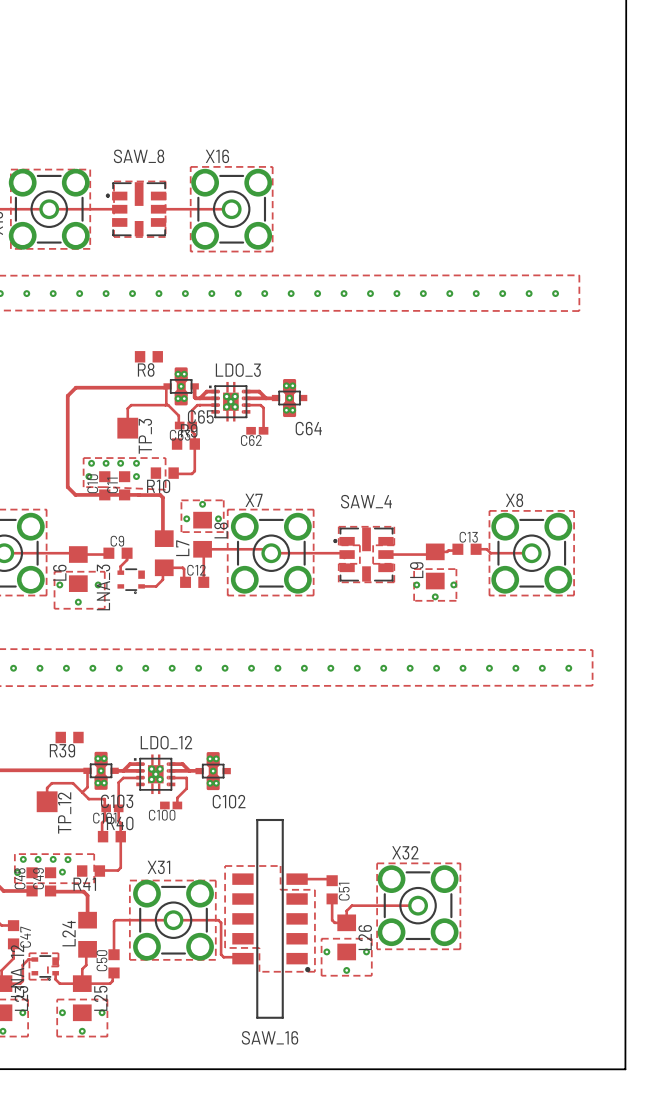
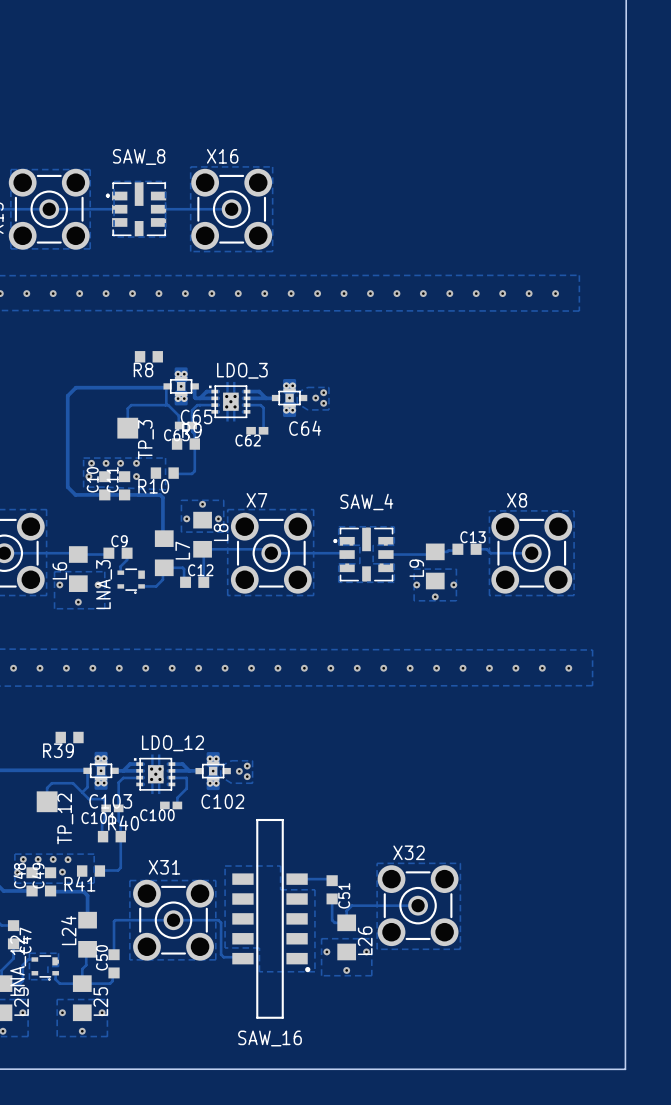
zone outline: none -> (307, 387) (297, 392) (297, 403) (307, 409) (328, 409) (328, 387) (307, 387)
via: none -> (323, 392)
via: none -> (315, 398)
via: none -> (323, 403)
zone outline: none -> (231, 760) (220, 766) (220, 776) (231, 783) (252, 783) (252, 760) (231, 760)
via: none -> (247, 766)
via: none -> (239, 771)
via: none -> (247, 776)

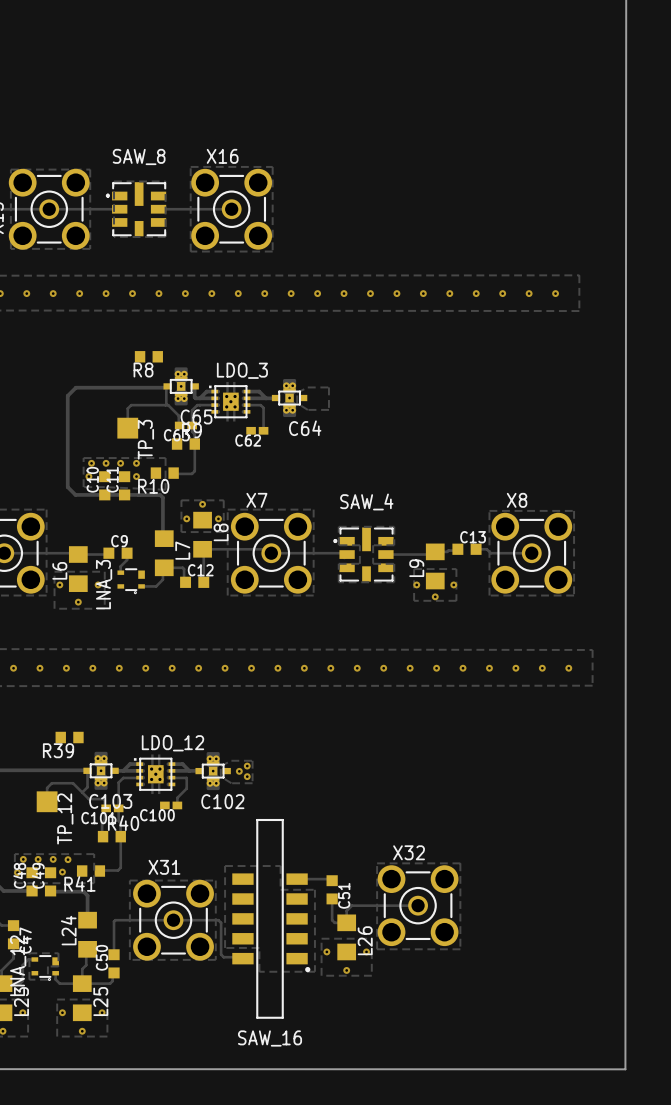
via: (323, 392) -> none
via: (315, 398) -> none
via: (323, 403) -> none

